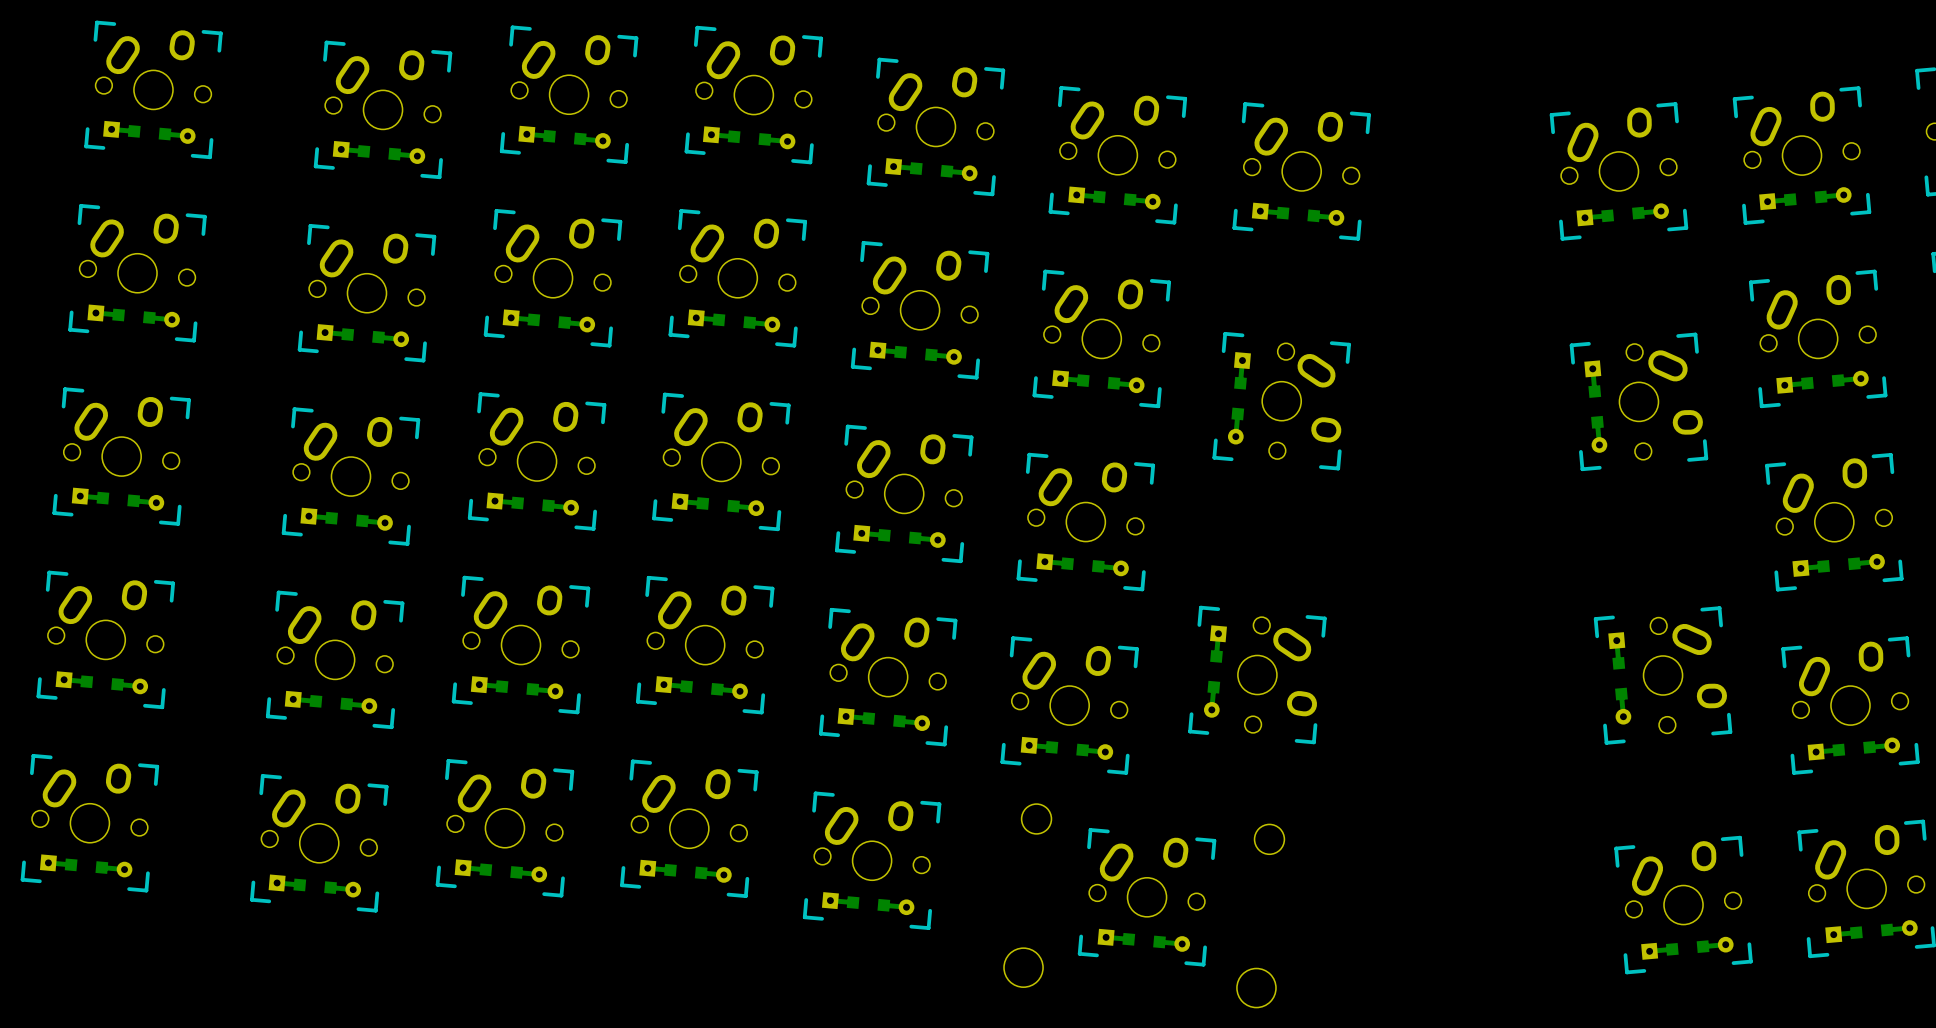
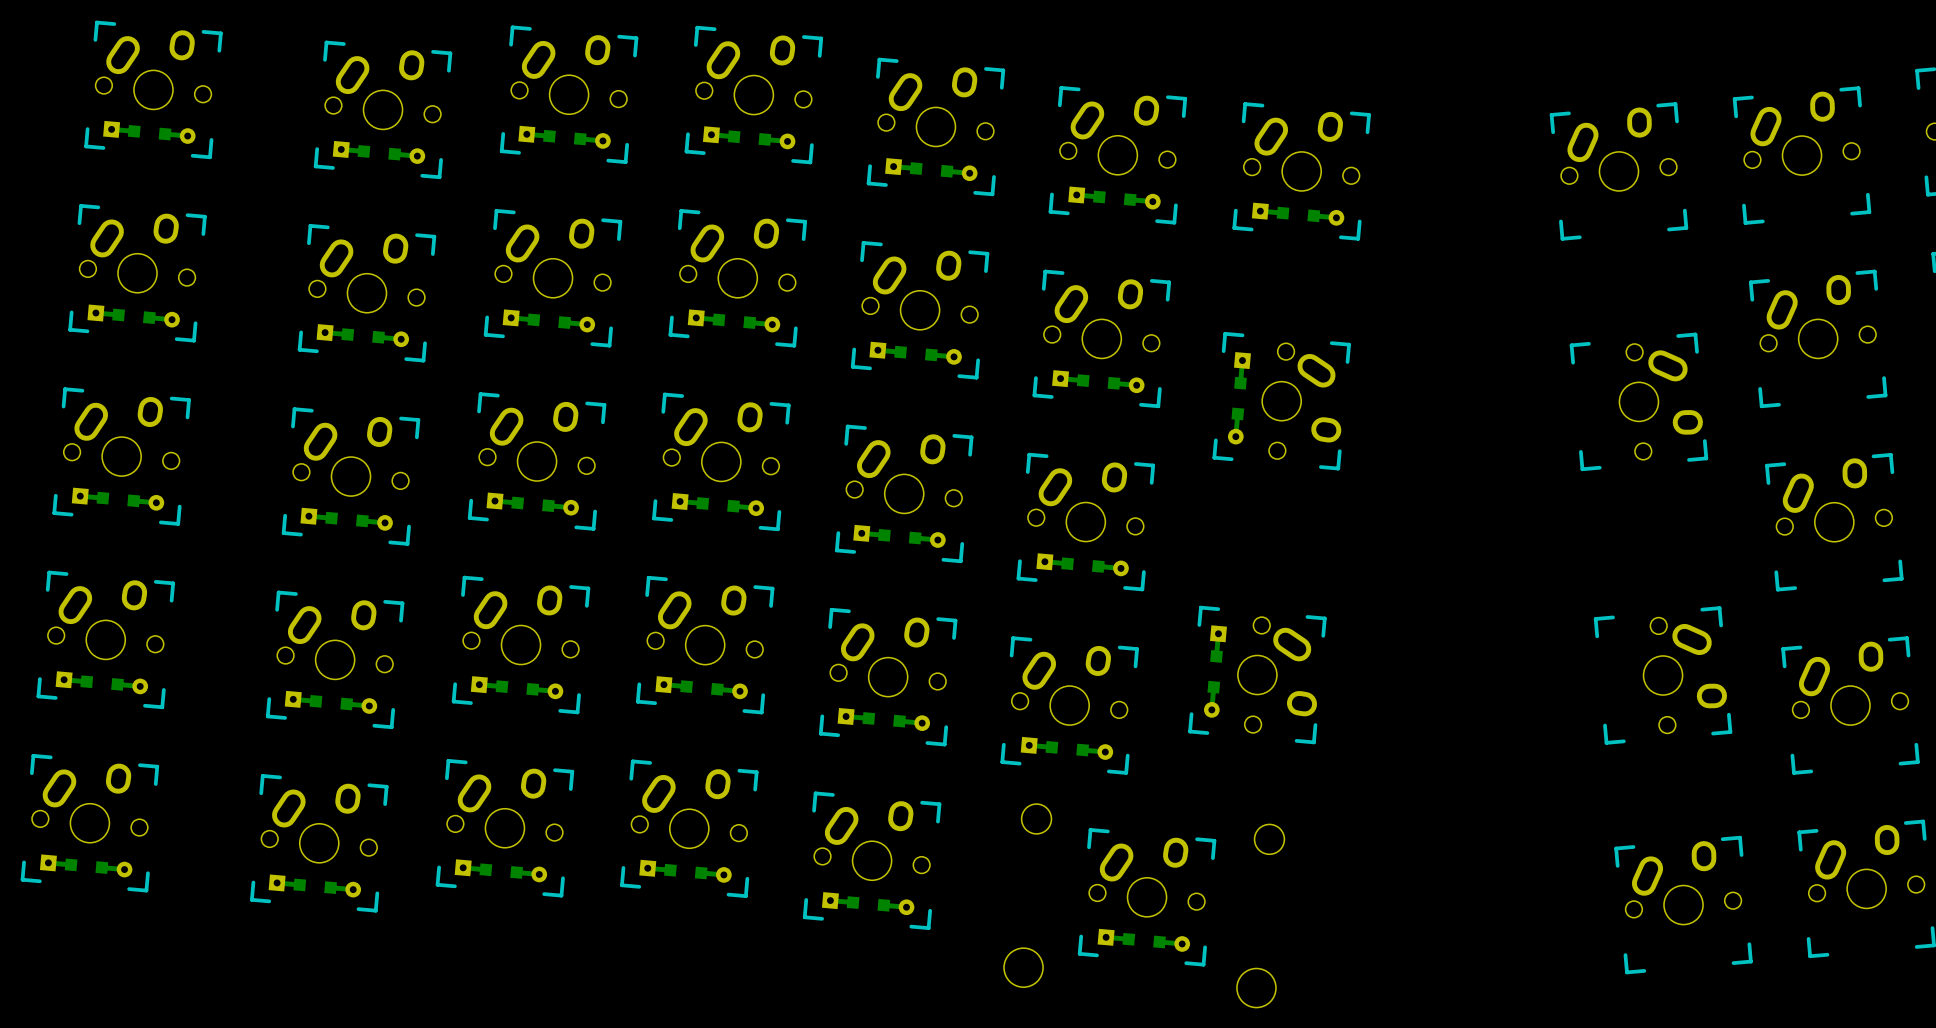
part: (1805, 198) -> none
part: (1622, 214) -> none
part: (1822, 382) -> none
part: (1595, 406) -> none
part: (1838, 565) -> none
part: (1619, 678) -> none
part: (1853, 749) -> none
part: (1871, 931) -> none
part: (1687, 948) -> none

